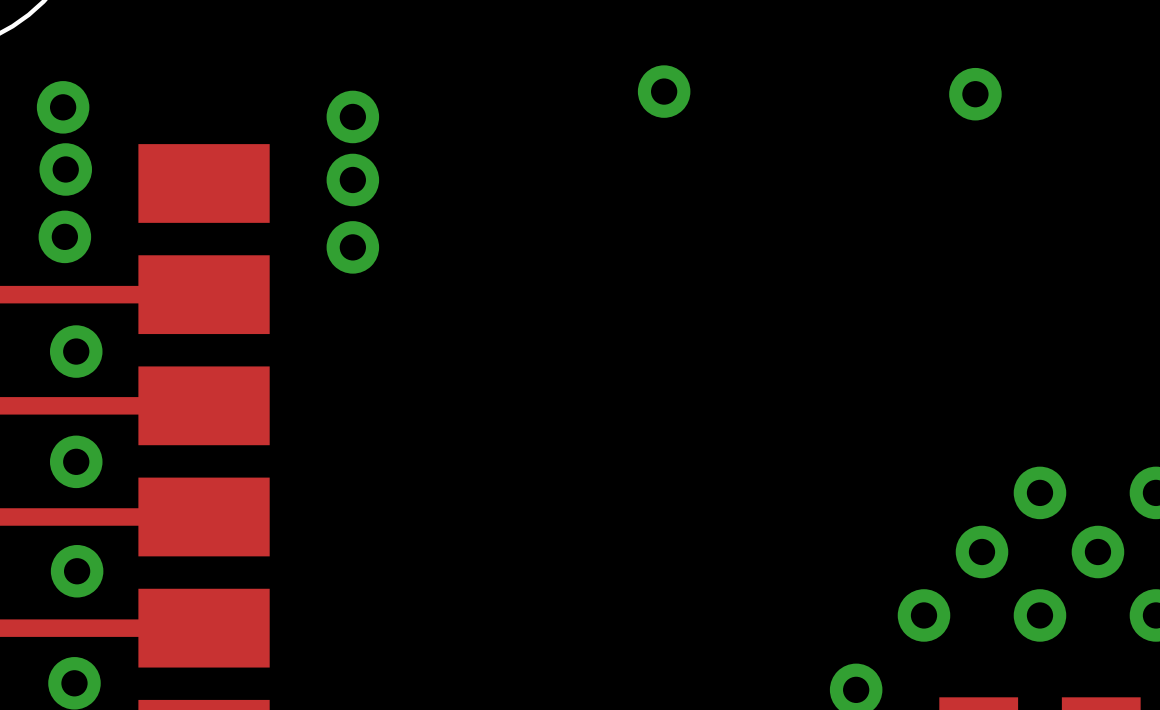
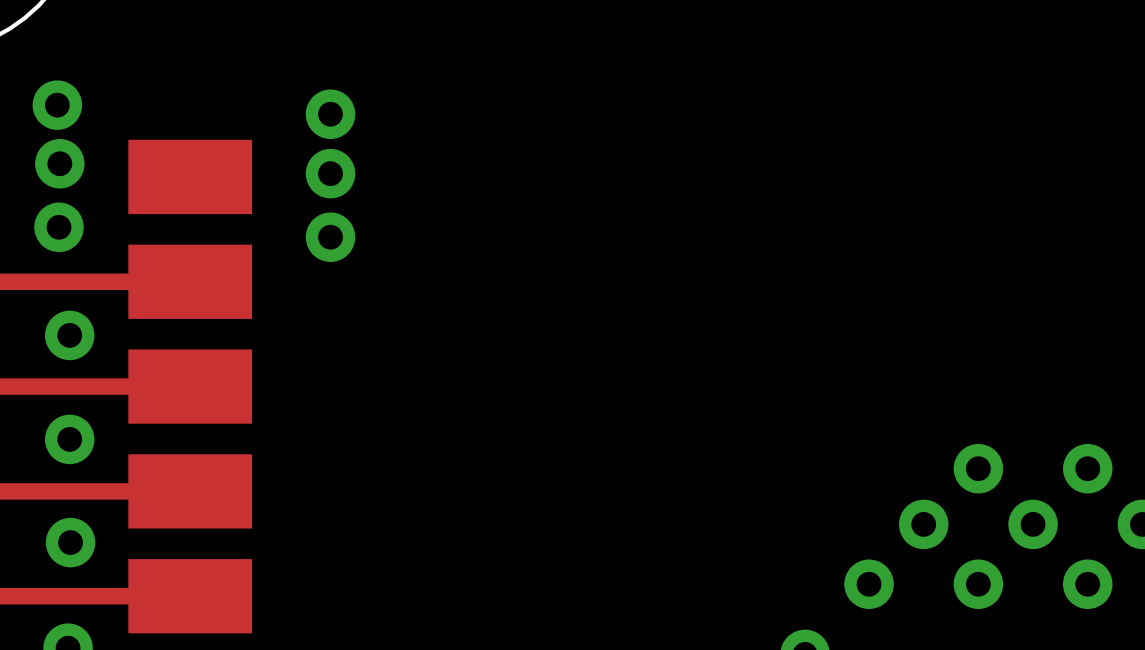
via: (664, 91) -> none
via: (975, 94) -> none

